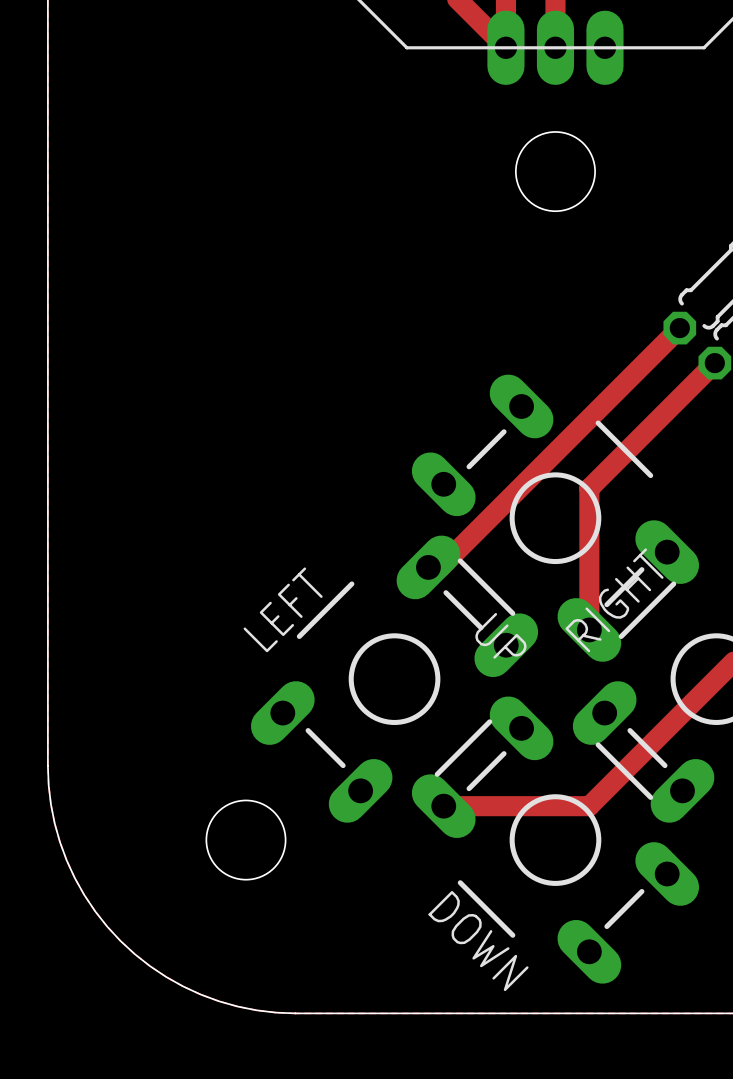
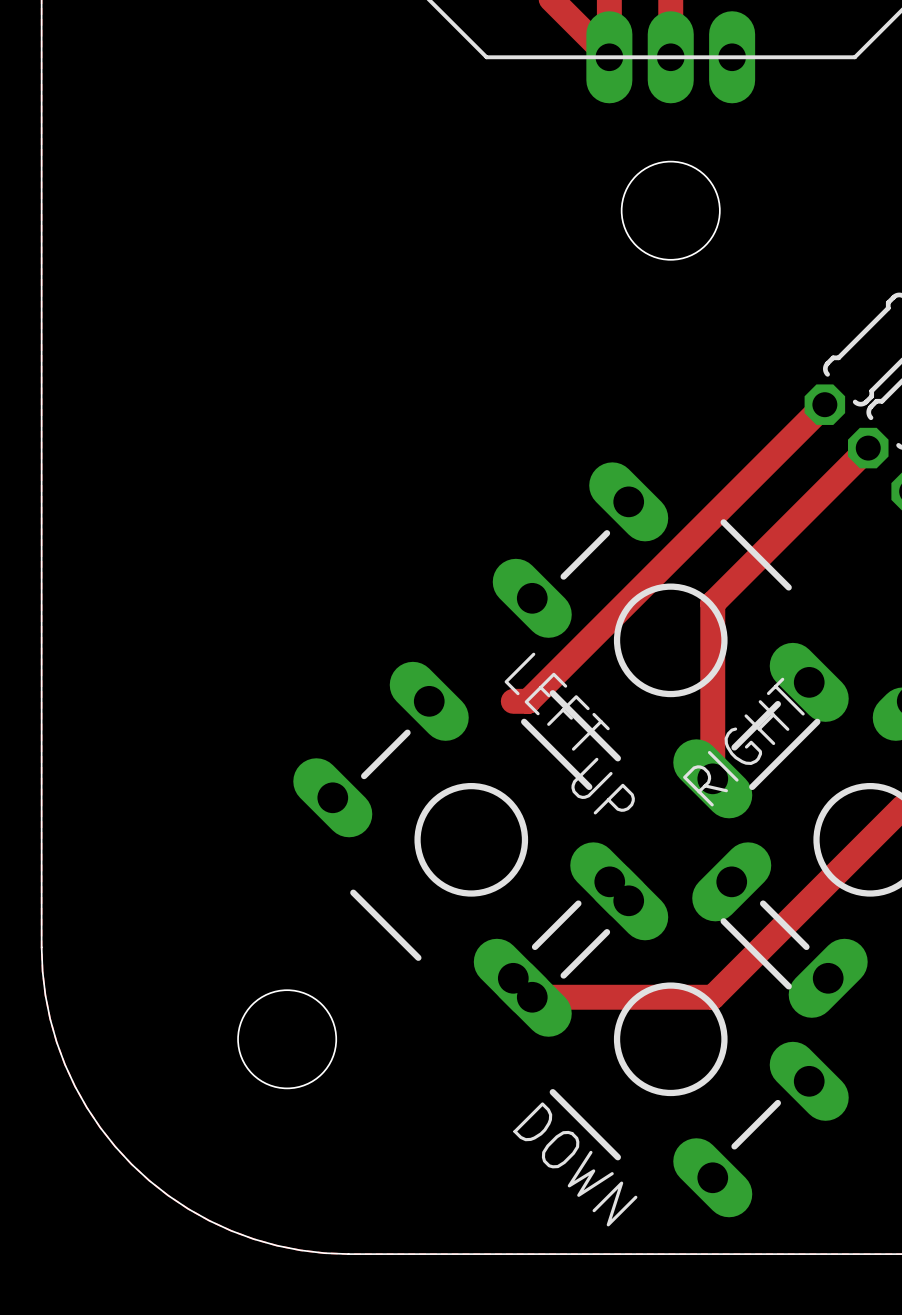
LEFT rotation: 0° (394, 679) -> 90° clockwise (471, 839)

